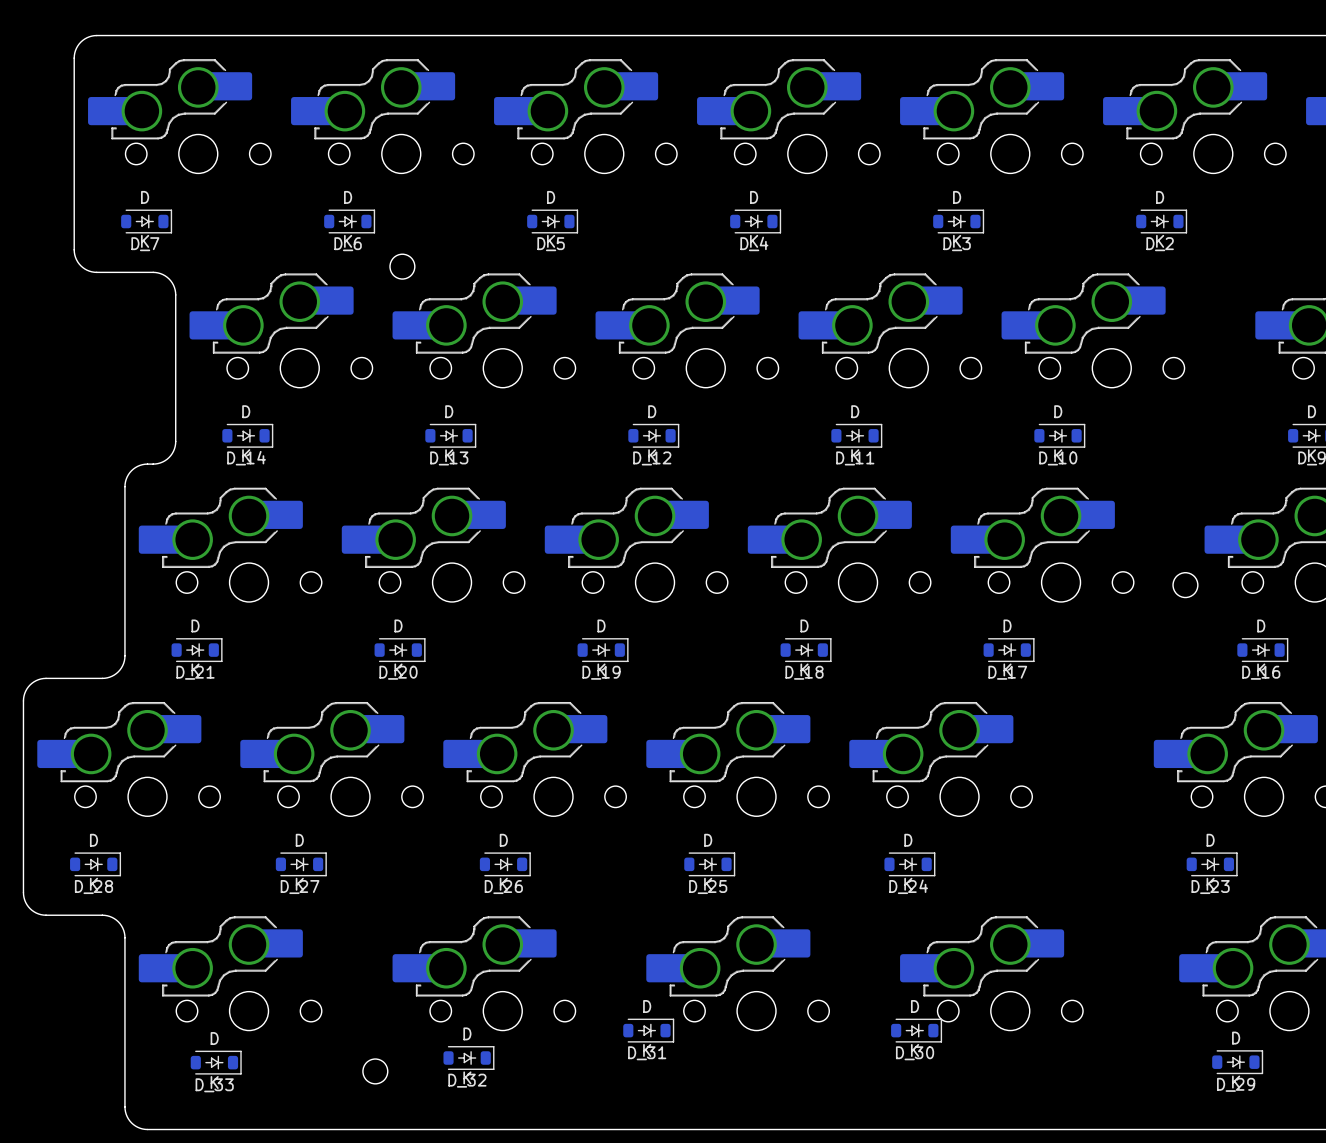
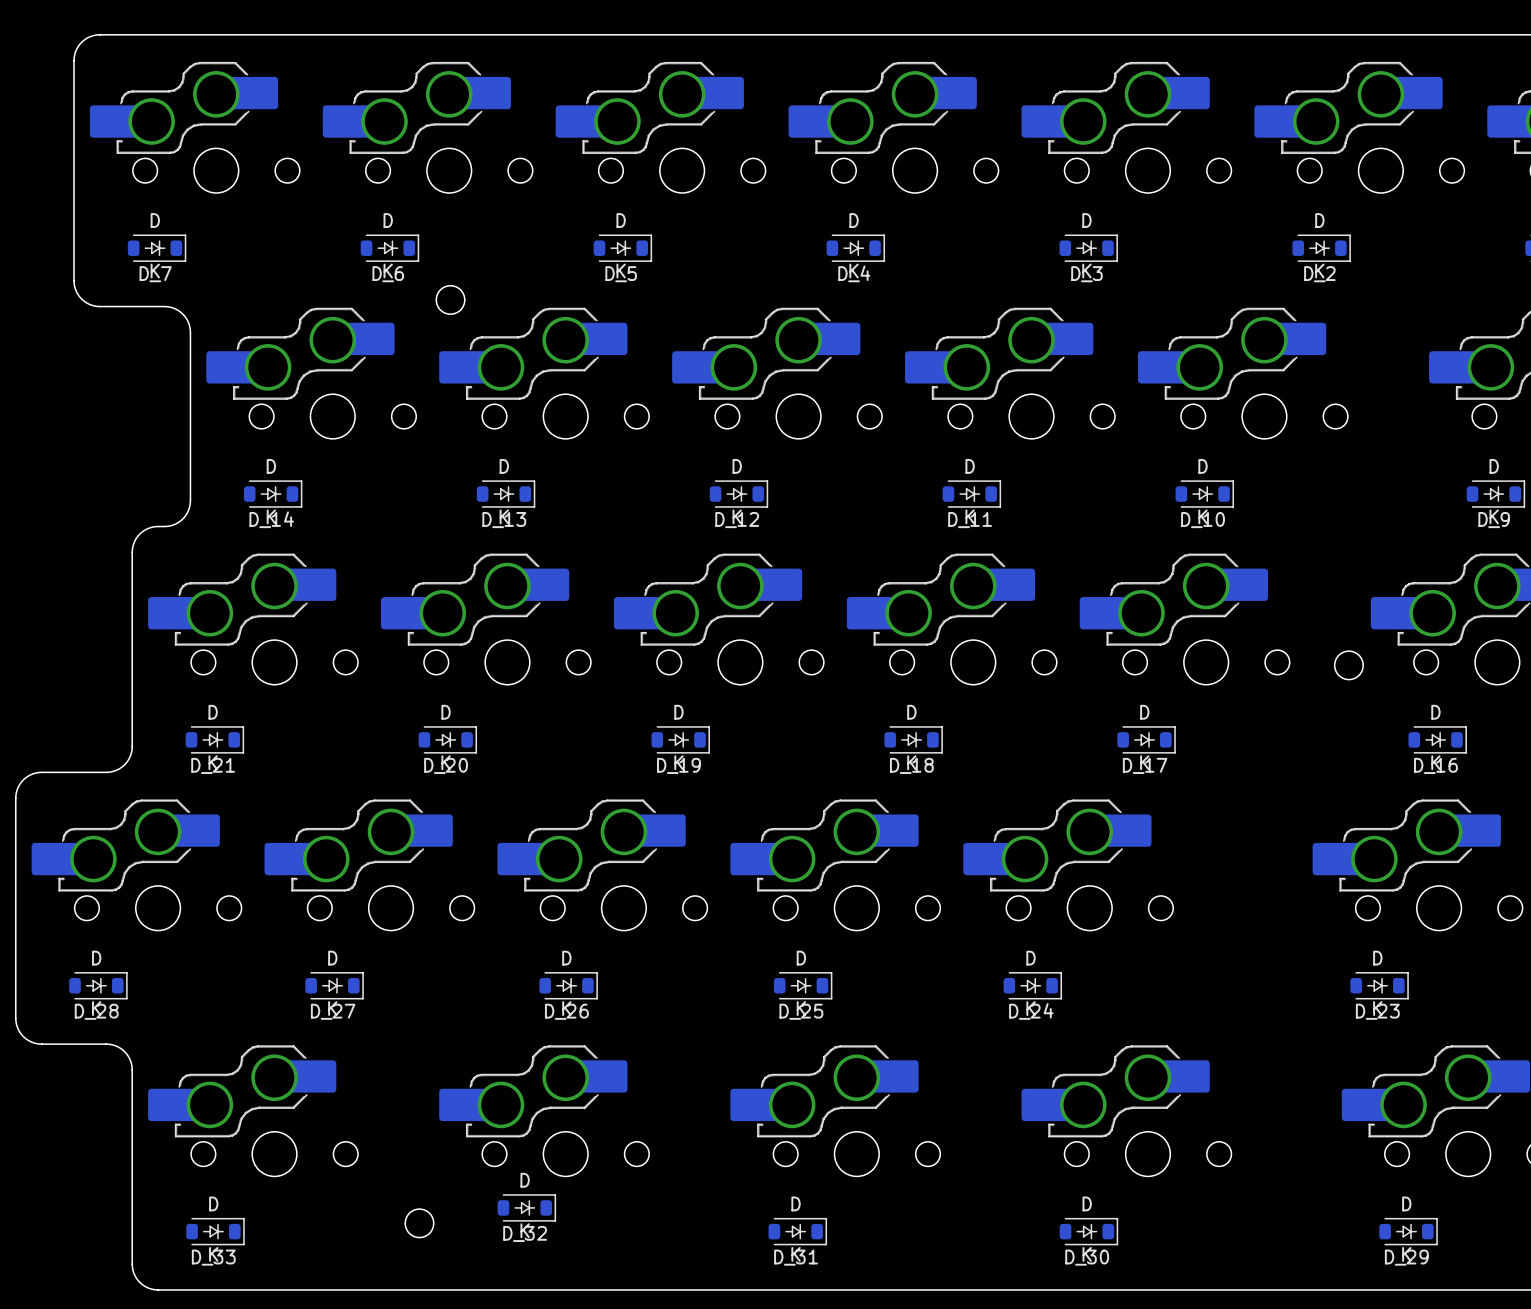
D_31 position: (648, 1030) -> (797, 1231)
D_30 position: (916, 1030) -> (1088, 1231)
D_33 position: (216, 1062) -> (215, 1231)
D_29 position: (1237, 1062) -> (1408, 1231)

